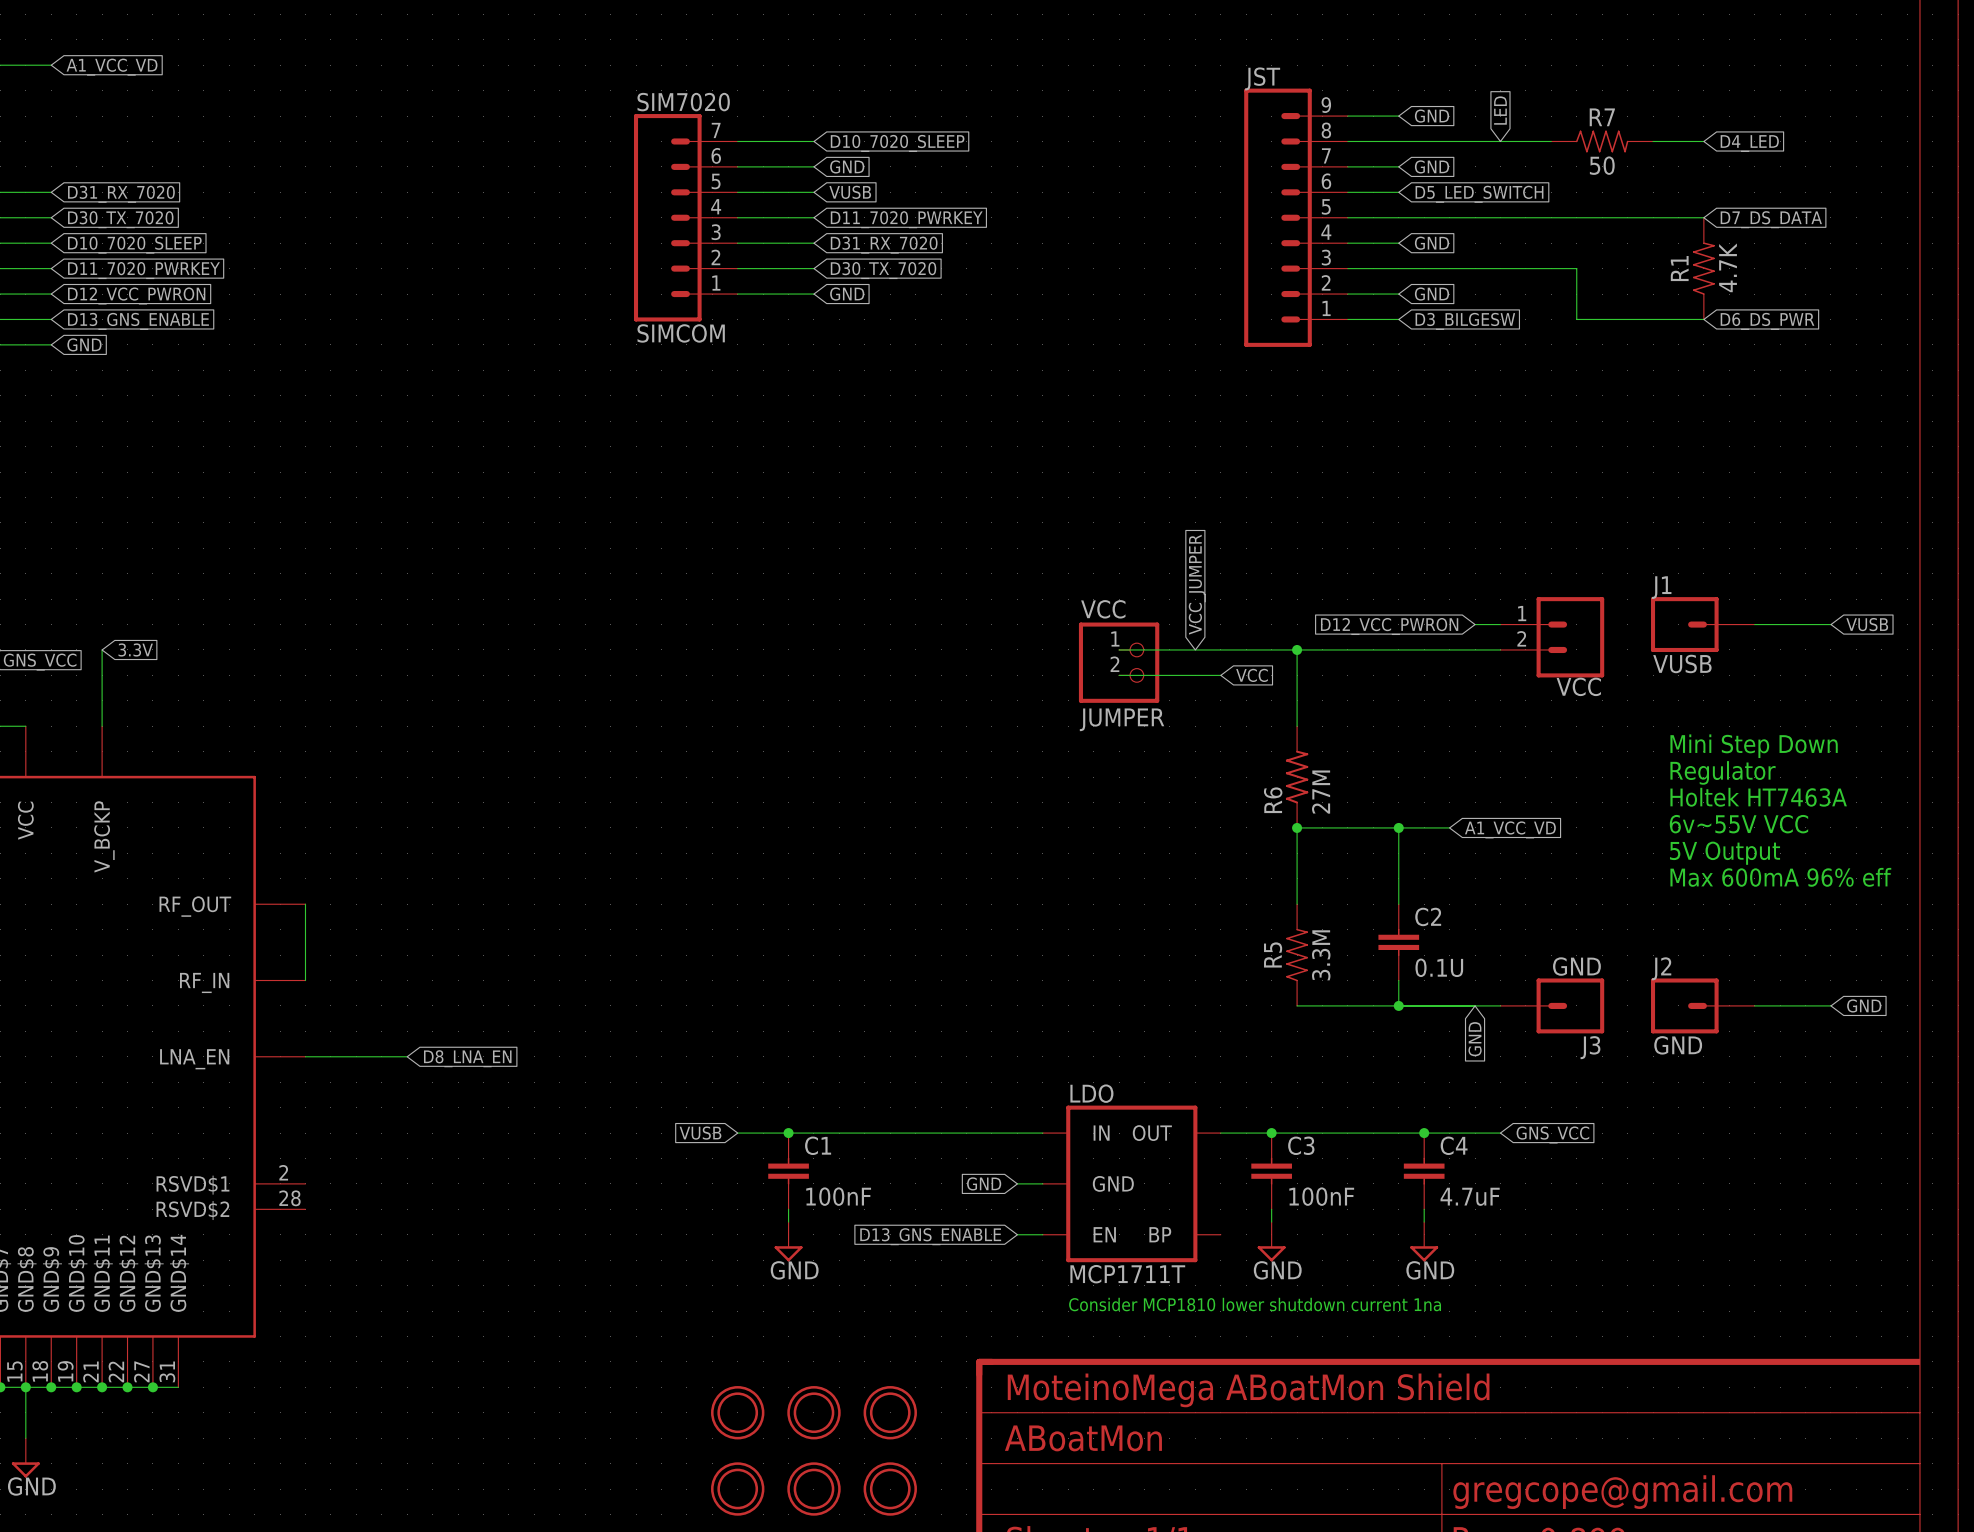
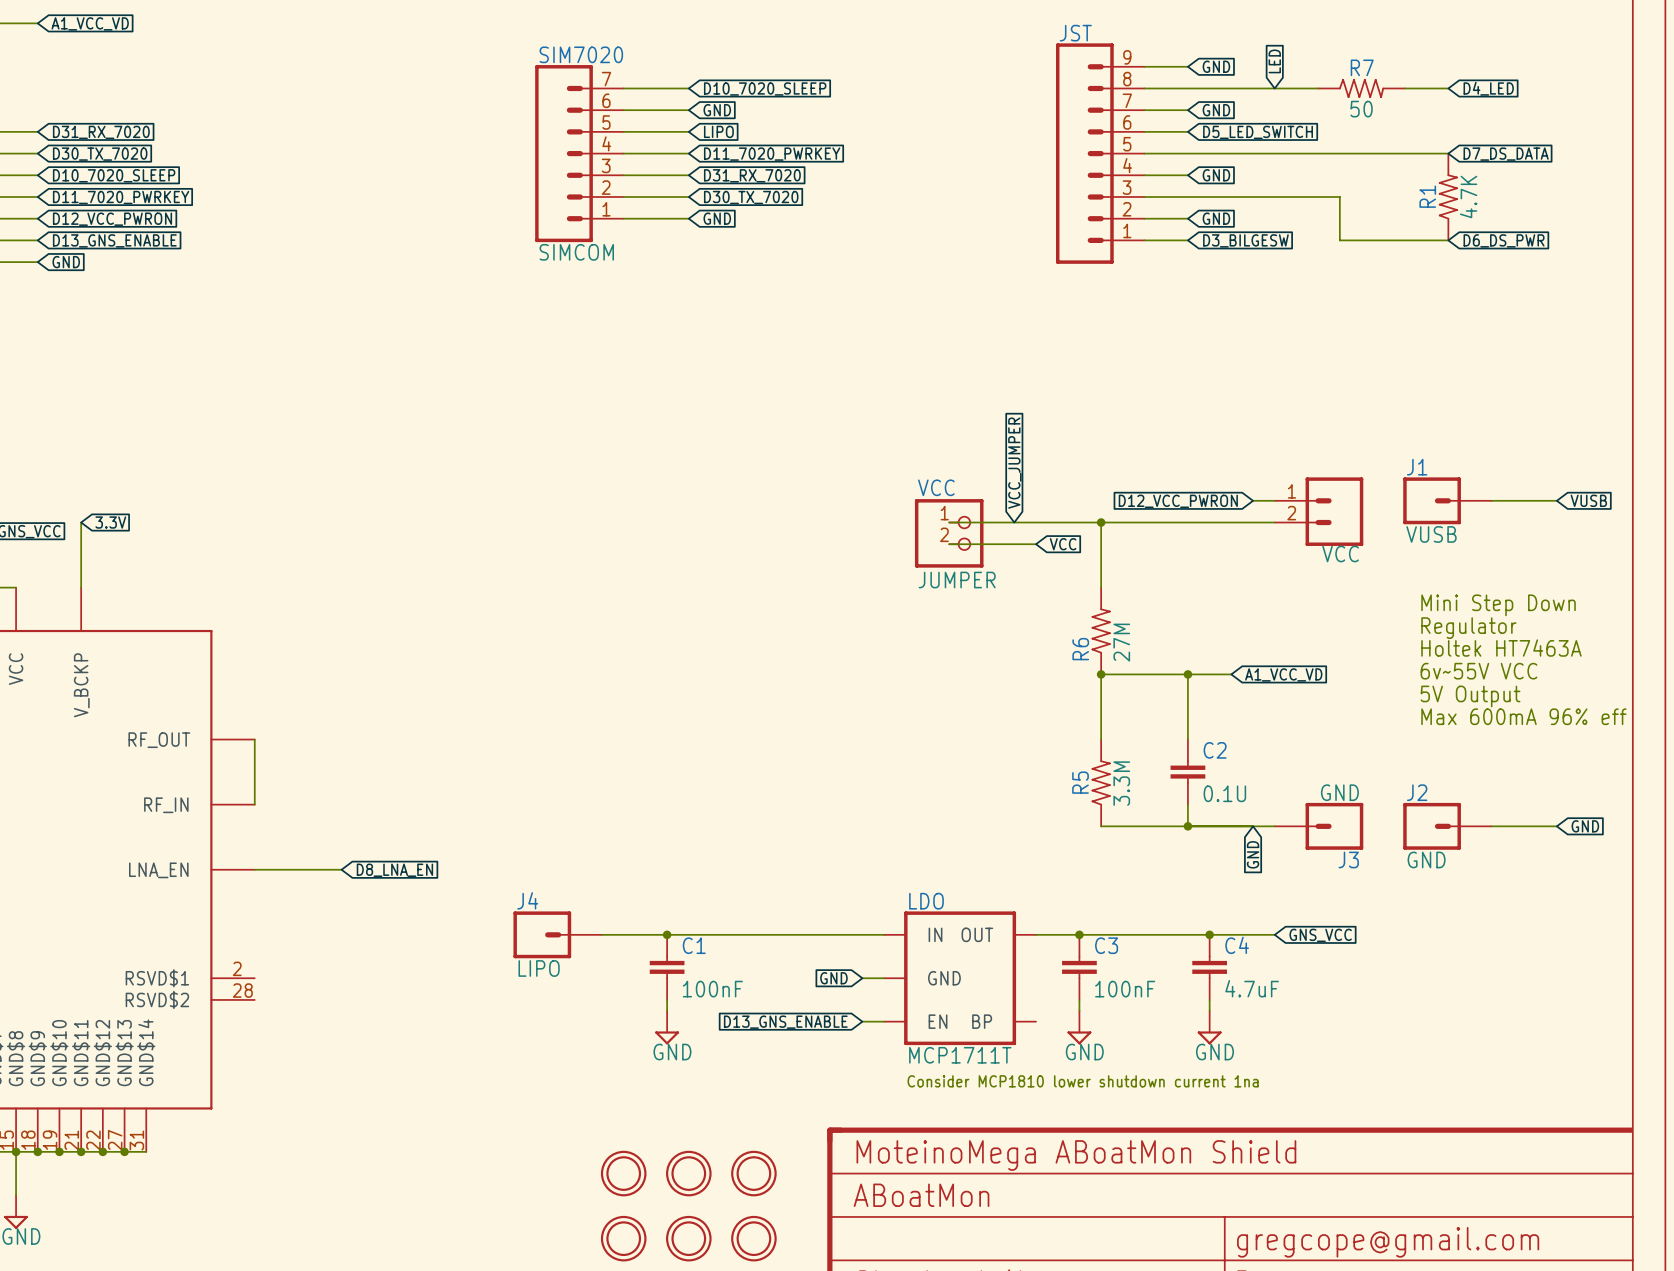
global label: VUSB (850, 192) -> LIPO (718, 131)
J4: none -> LIPO (557, 934)
global label: VUSB (700, 1133) -> none
wire: none -> (602, 934) (623, 934)

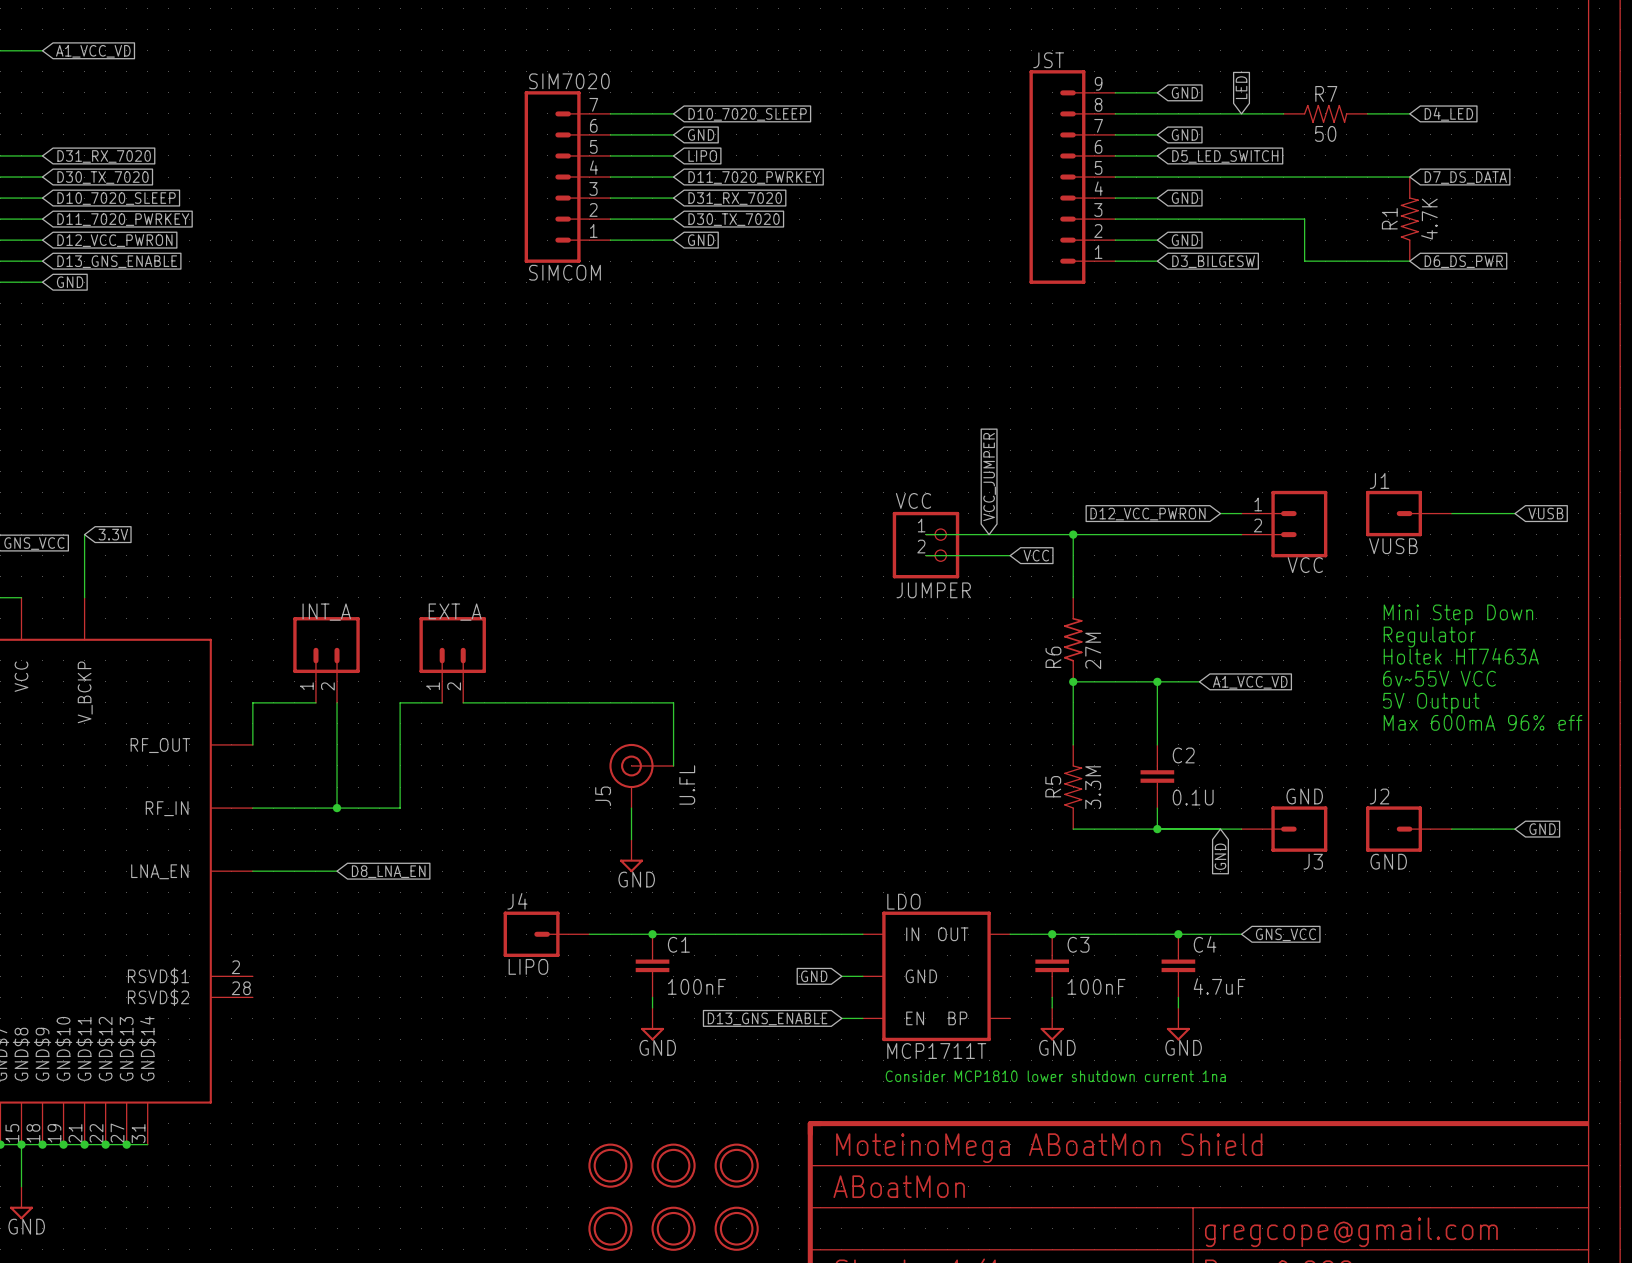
INT_A: none -> (326, 659)
EXT_A: none -> (452, 659)
wire: none -> (337, 702) (337, 808)
wire: none -> (442, 702) (400, 702) (400, 808) (252, 808)
wire: none -> (463, 702) (673, 702) (673, 765)
wire: (254, 739) (254, 804) -> (252, 744) (252, 702) (315, 702)
J5: none -> U.FL (641, 775)
junction: none -> (337, 808)
wire: none -> (631, 808) (631, 839)
power symbol: none -> GND (631, 855)

